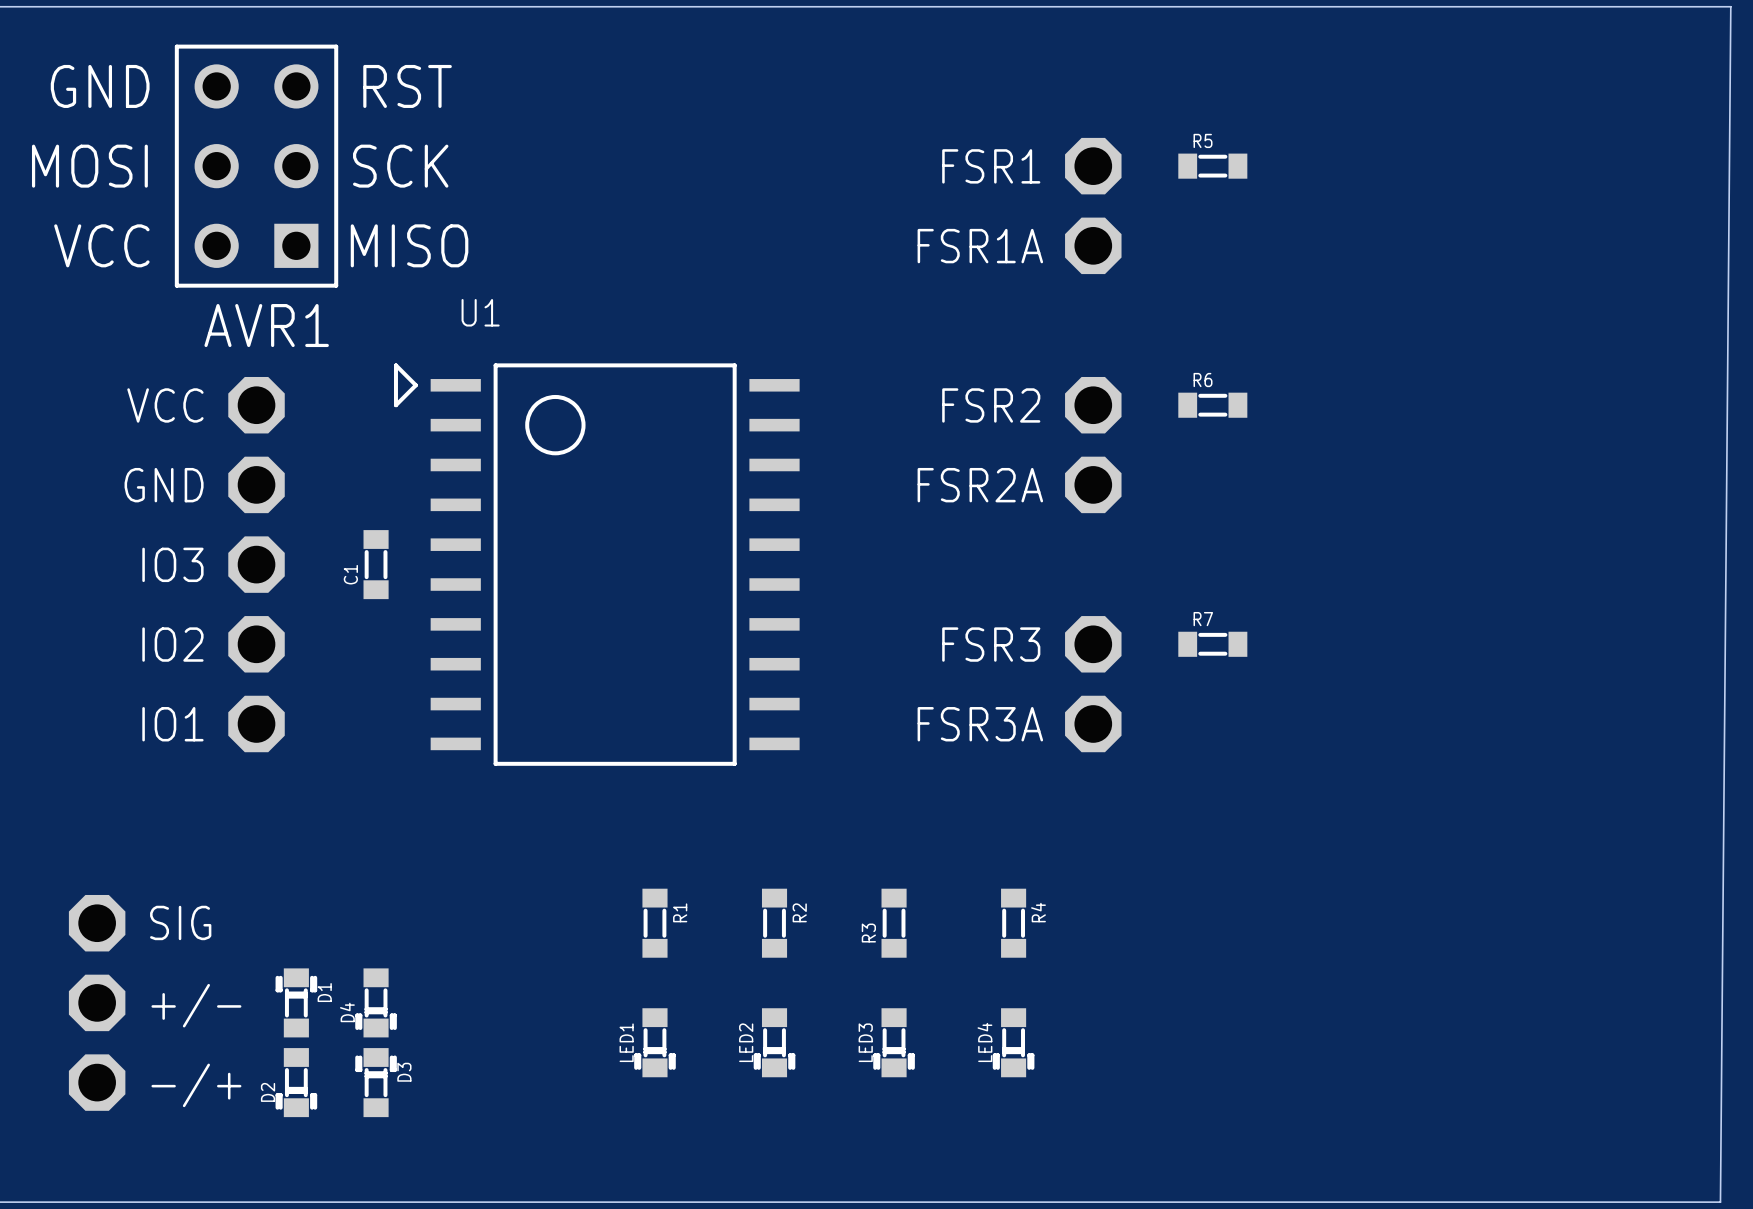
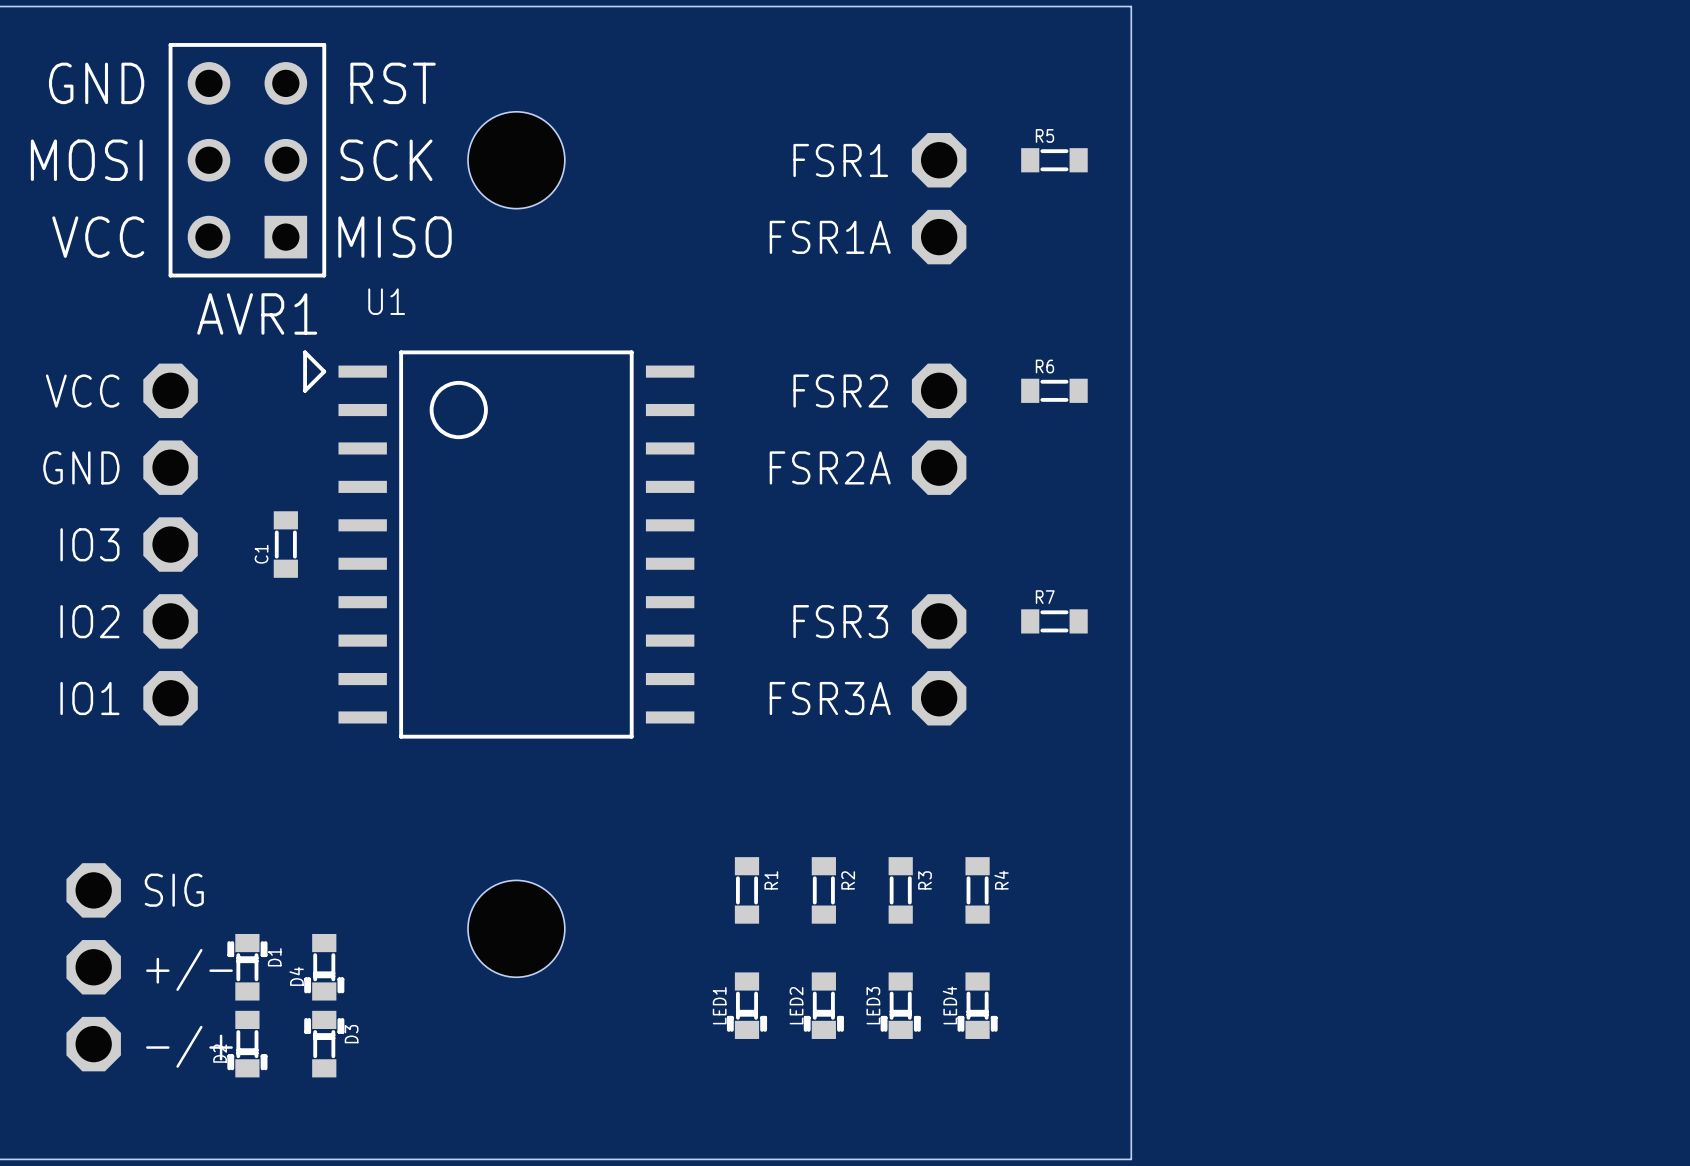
board edge: (1172, 6) (1730, 6) (1720, 1202) (1172, 1202) -> (1131, 6) (1131, 1159)
hole: none -> (516, 160)
FSR1 position: (1093, 166) -> (939, 160)
R5 position: (1212, 166) -> (1054, 160)
FSR1A position: (1093, 245) -> (939, 237)
VCC position: (256, 405) -> (170, 390)
FSR2 position: (1093, 405) -> (939, 390)
R6 position: (1212, 405) -> (1054, 390)
GND position: (256, 484) -> (170, 467)
FSR2A position: (1093, 484) -> (939, 467)
IO3 position: (256, 564) -> (170, 544)
C1 position: (376, 564) -> (285, 544)
U1 position: (596, 564) -> (498, 544)
IO2 position: (256, 644) -> (170, 621)
FSR3 position: (1093, 644) -> (939, 621)
R7 position: (1212, 644) -> (1054, 621)
IO1 position: (256, 723) -> (170, 698)
FSR3A position: (1093, 723) -> (939, 698)
R2 name: R2 (799, 912) -> R1 (771, 880)
R1: (654, 923) -> none
R2: none -> (823, 890)
R3 position: (894, 923) -> (900, 890)
R3 name position: R3 (868, 933) -> R3 (925, 880)
hole: none -> (516, 928)
D1 position: (296, 1002) -> (247, 967)
D4 position: (376, 1002) -> (324, 967)
LED1: (654, 1042) -> none
LED2 name: LED2 (746, 1042) -> LED1 (719, 1005)
LED2: none -> (823, 1005)
LED3 position: (894, 1042) -> (900, 1005)
D2 position: (296, 1082) -> (247, 1044)
D3 position: (376, 1082) -> (324, 1044)

